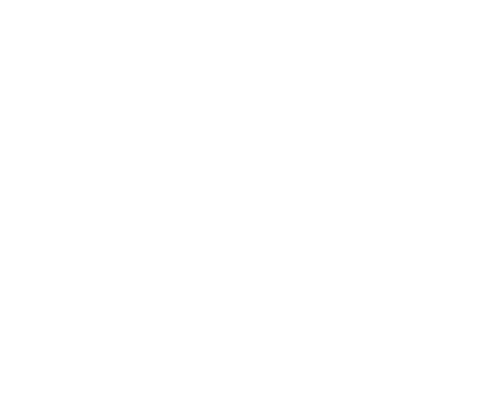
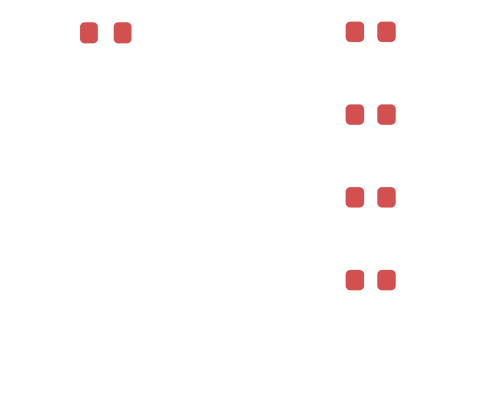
part: none -> (370, 31)
part: none -> (105, 32)
part: none -> (370, 114)
part: none -> (370, 197)
part: none -> (370, 280)

